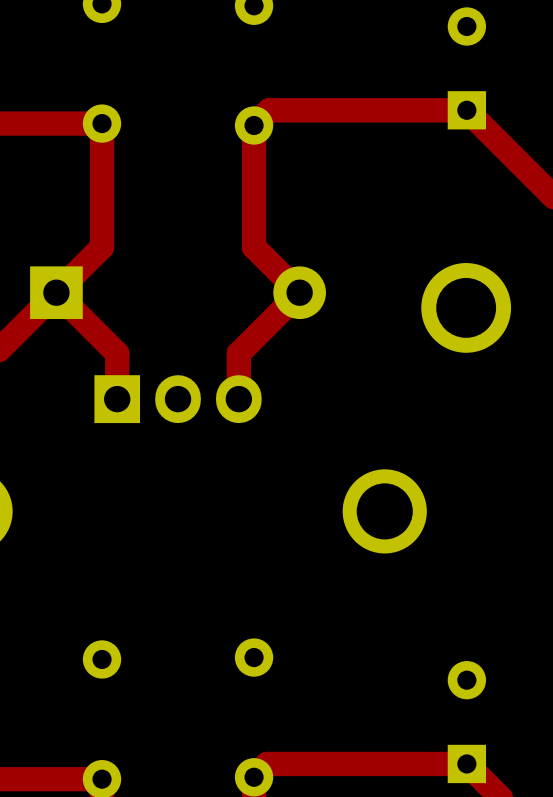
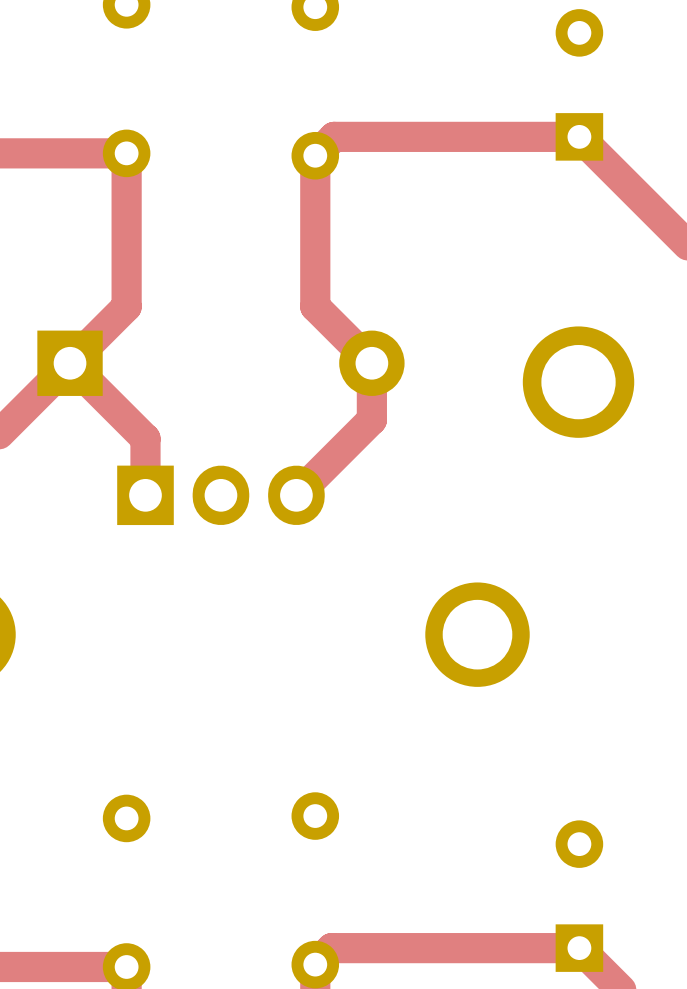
top track: (299, 292) (238, 353) (238, 399) -> (371, 363) (371, 419) (296, 495)

